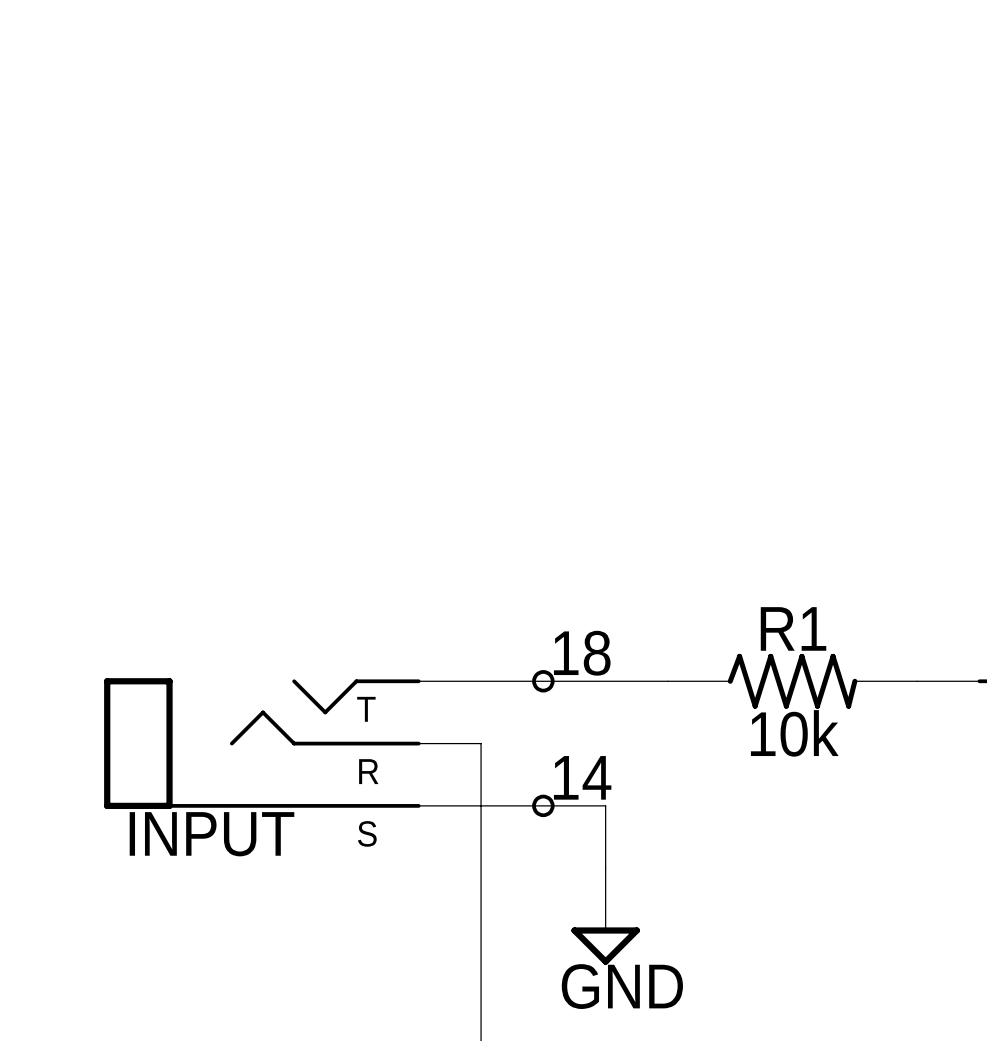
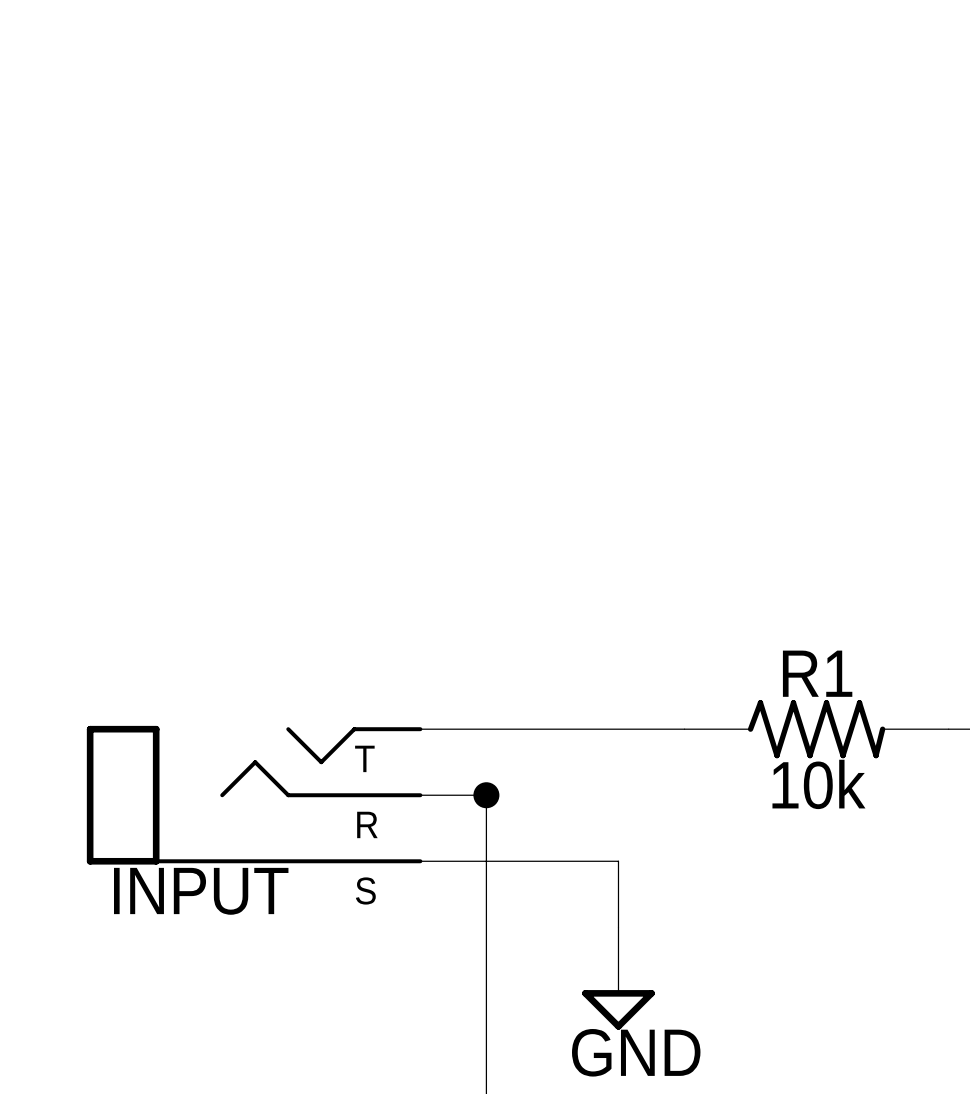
text: 18 (582, 653) -> none
drawing: [532, 670, 555, 693] -> none
junction: none -> (486, 795)
text: 14 (582, 777) -> none
drawing: [532, 794, 555, 818] -> none

